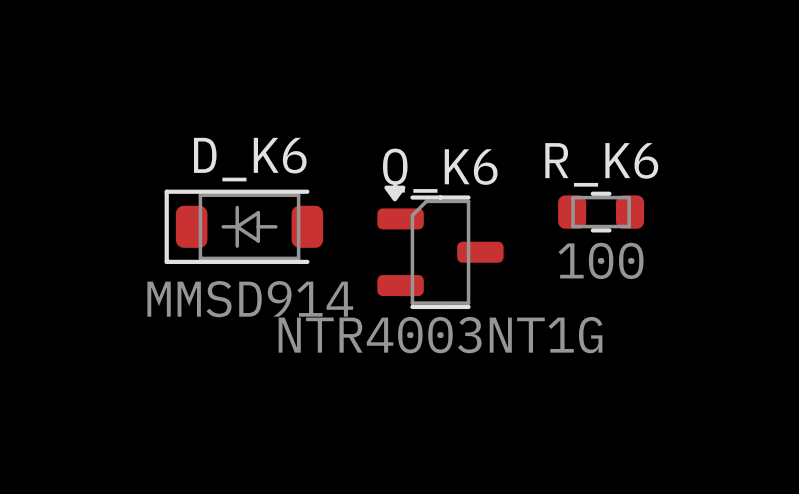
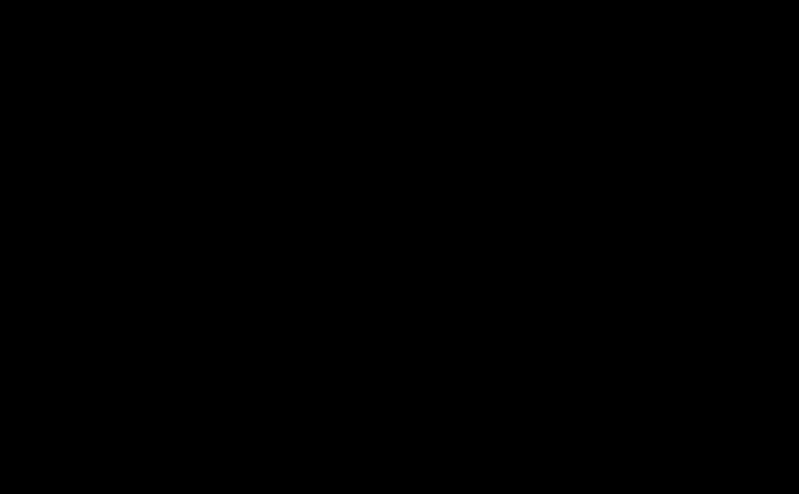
R_K6: 100 (601, 212) -> none
D_K6: MMSD914 (243, 226) -> none
Q_K6: NTR4003NT1G (440, 247) -> none

